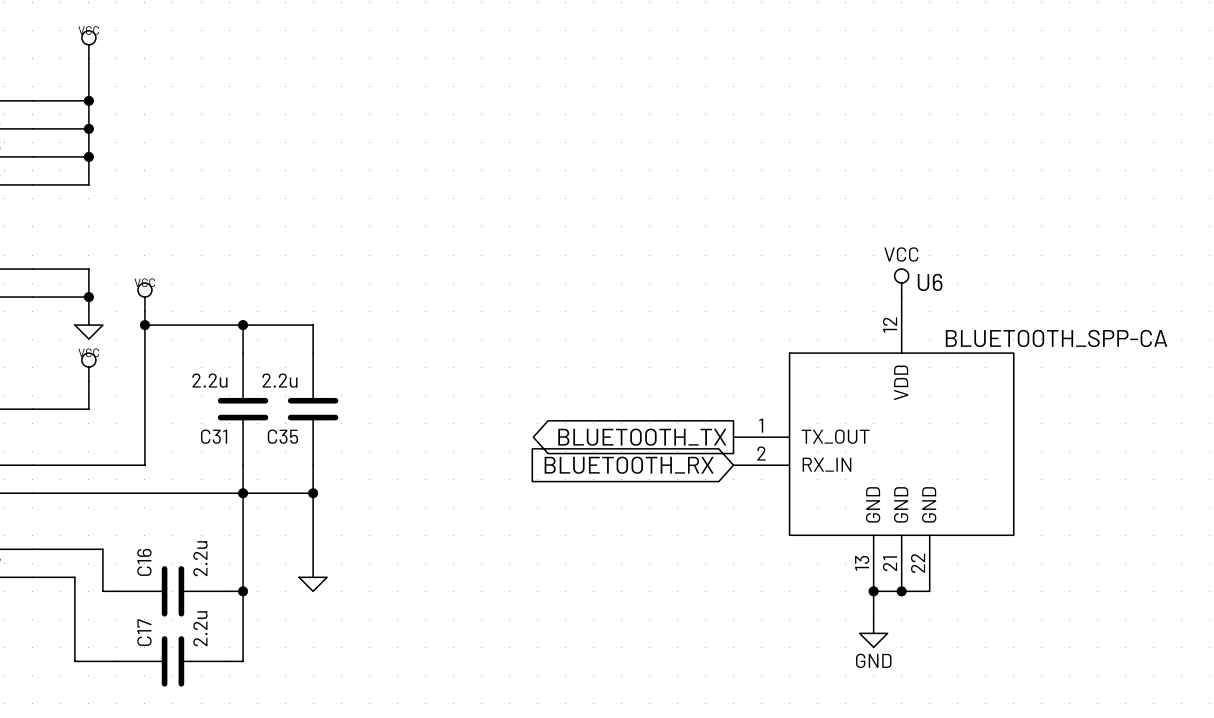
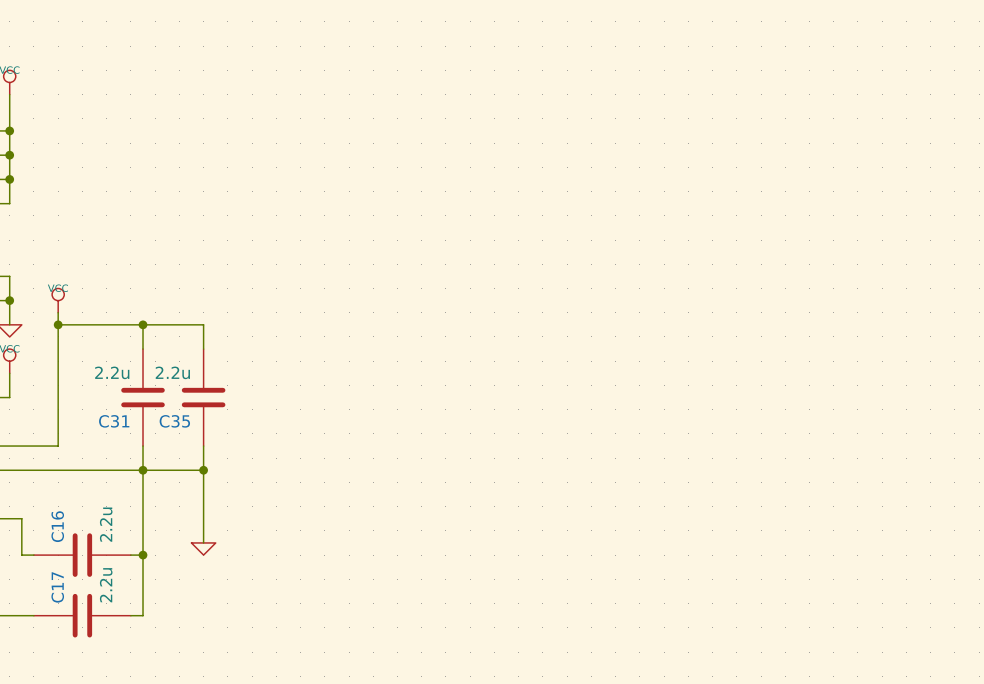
power symbol: VCC (901, 283) -> none
global label: BLUETOOTH_TX (642, 437) -> none
U6: BLUETOOTH_SPP-CA (873, 444) -> none
global label: BLUETOOTH_RX (629, 465) -> none
junction: (873, 591) -> none
junction: (901, 591) -> none
wire: (929, 591) (873, 591) (873, 619) -> none
power symbol: GND (873, 633) -> none

